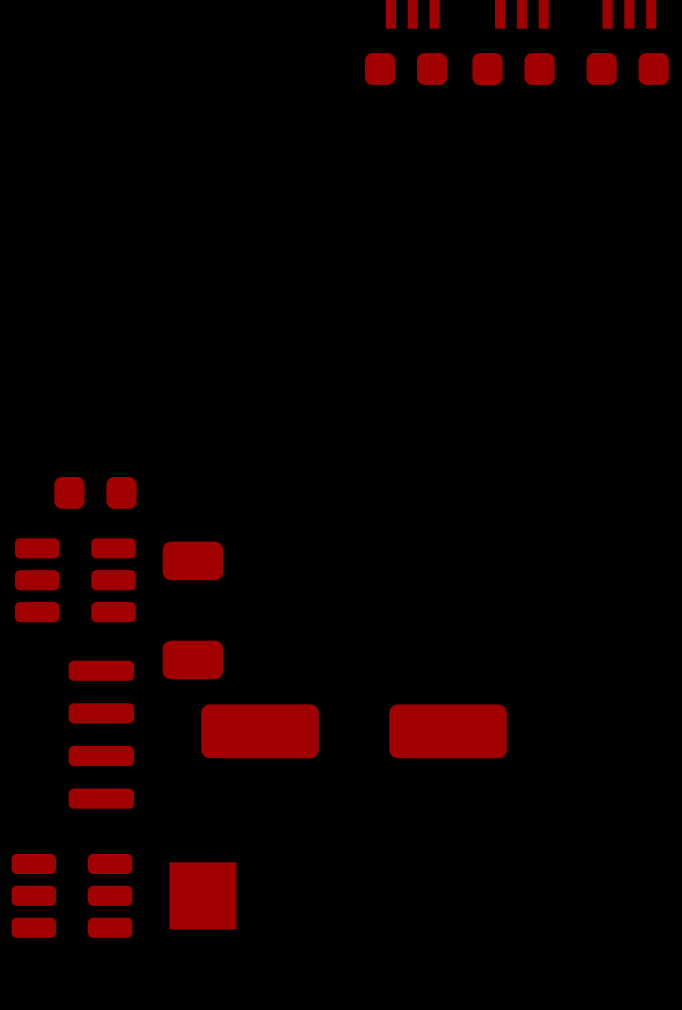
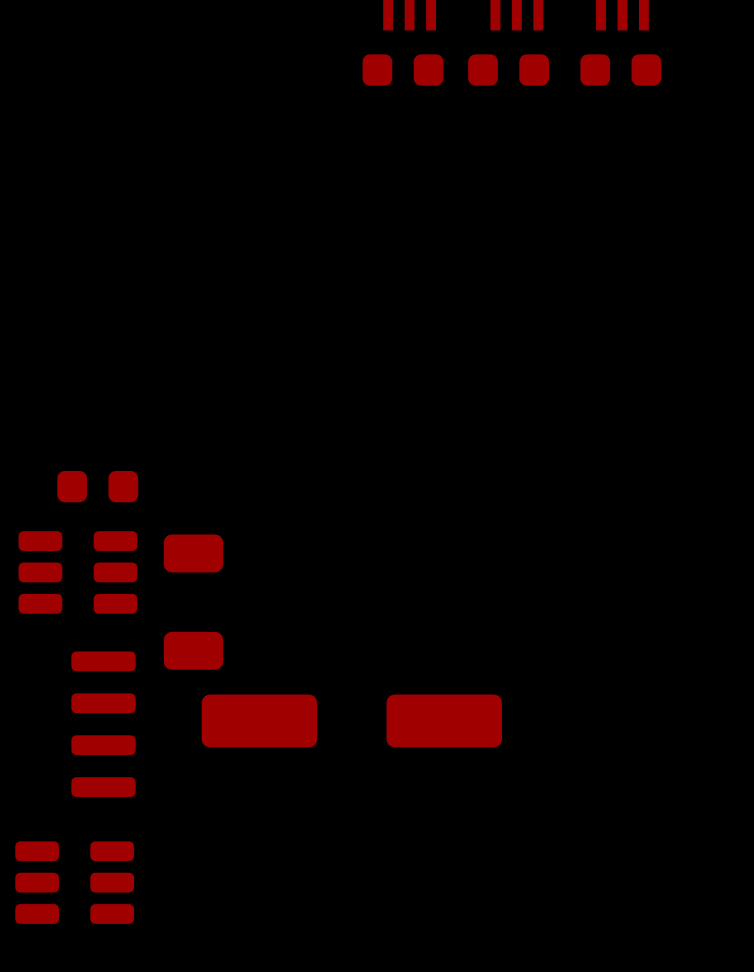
part: (202, 895) -> none

